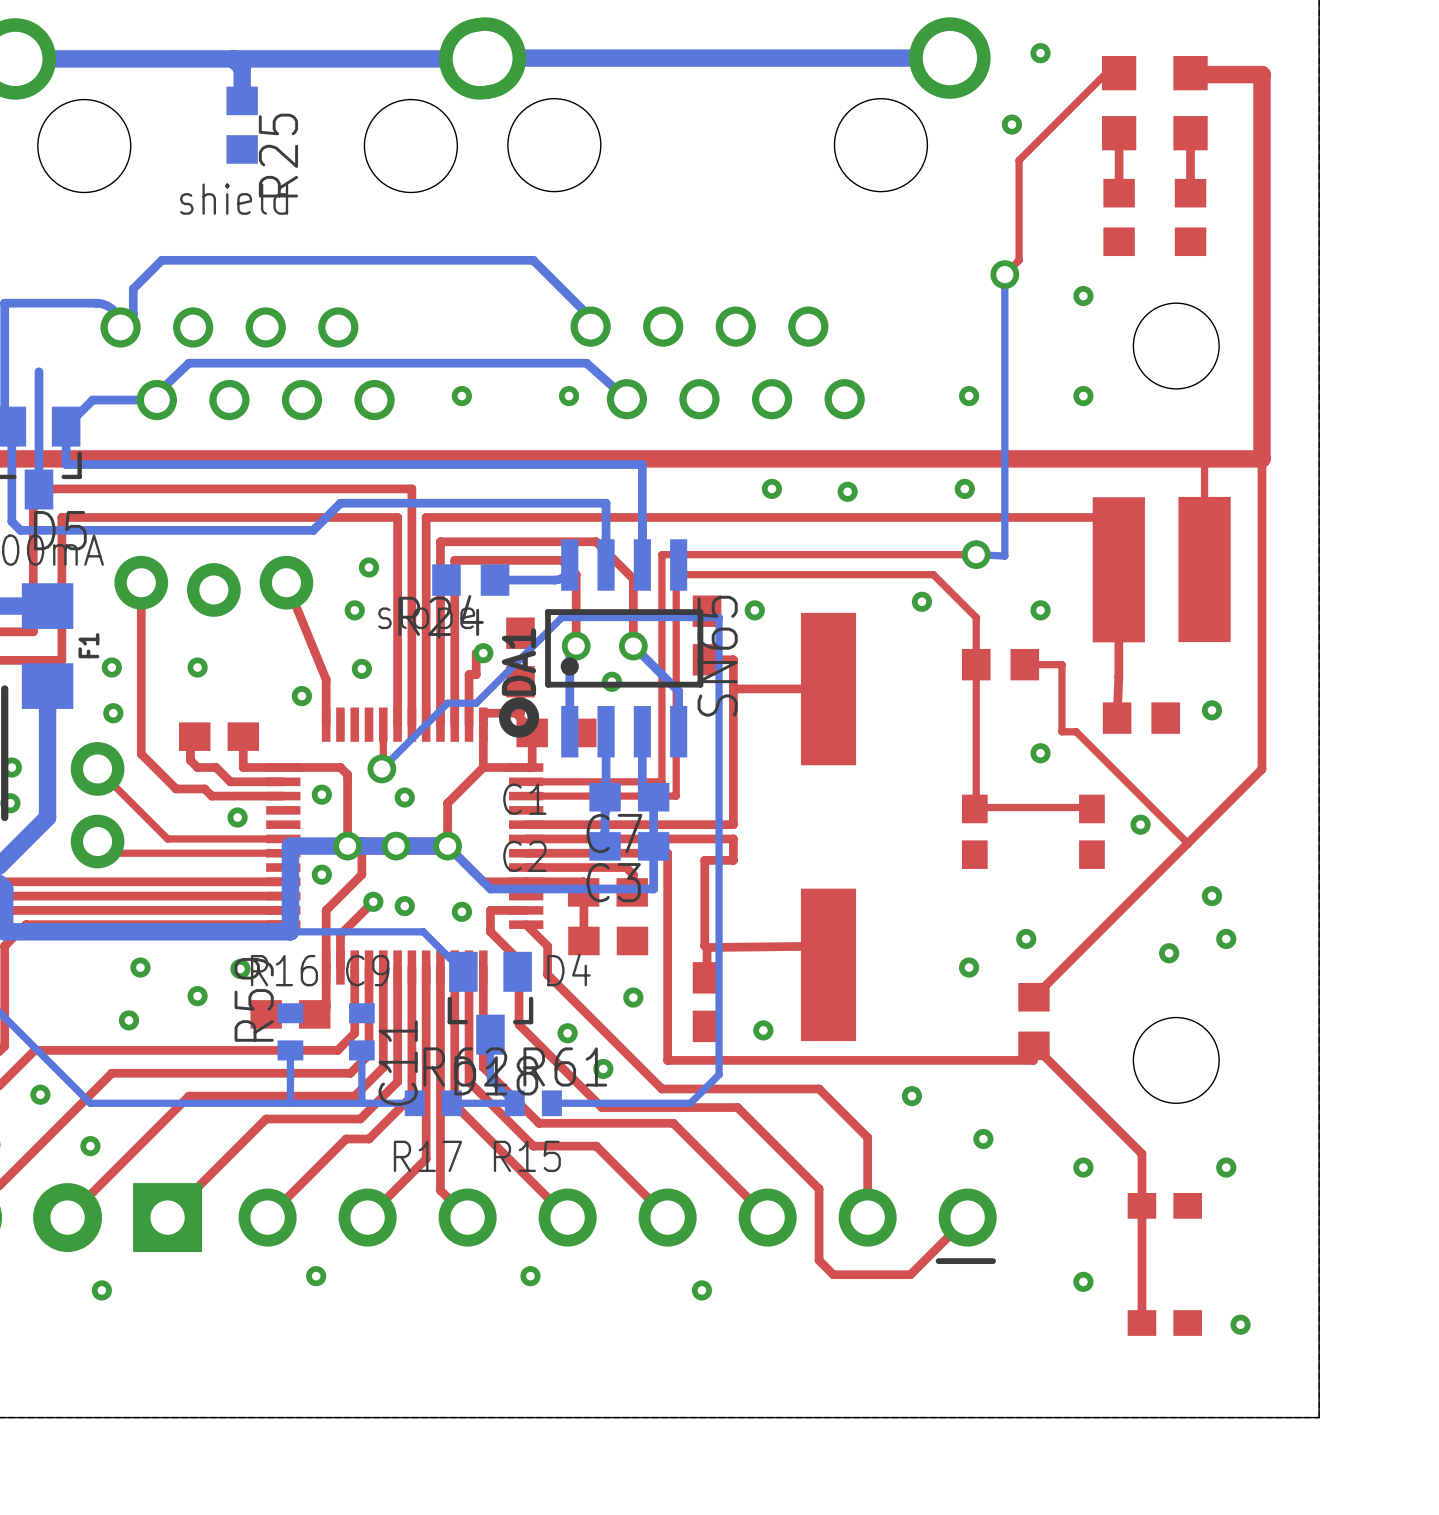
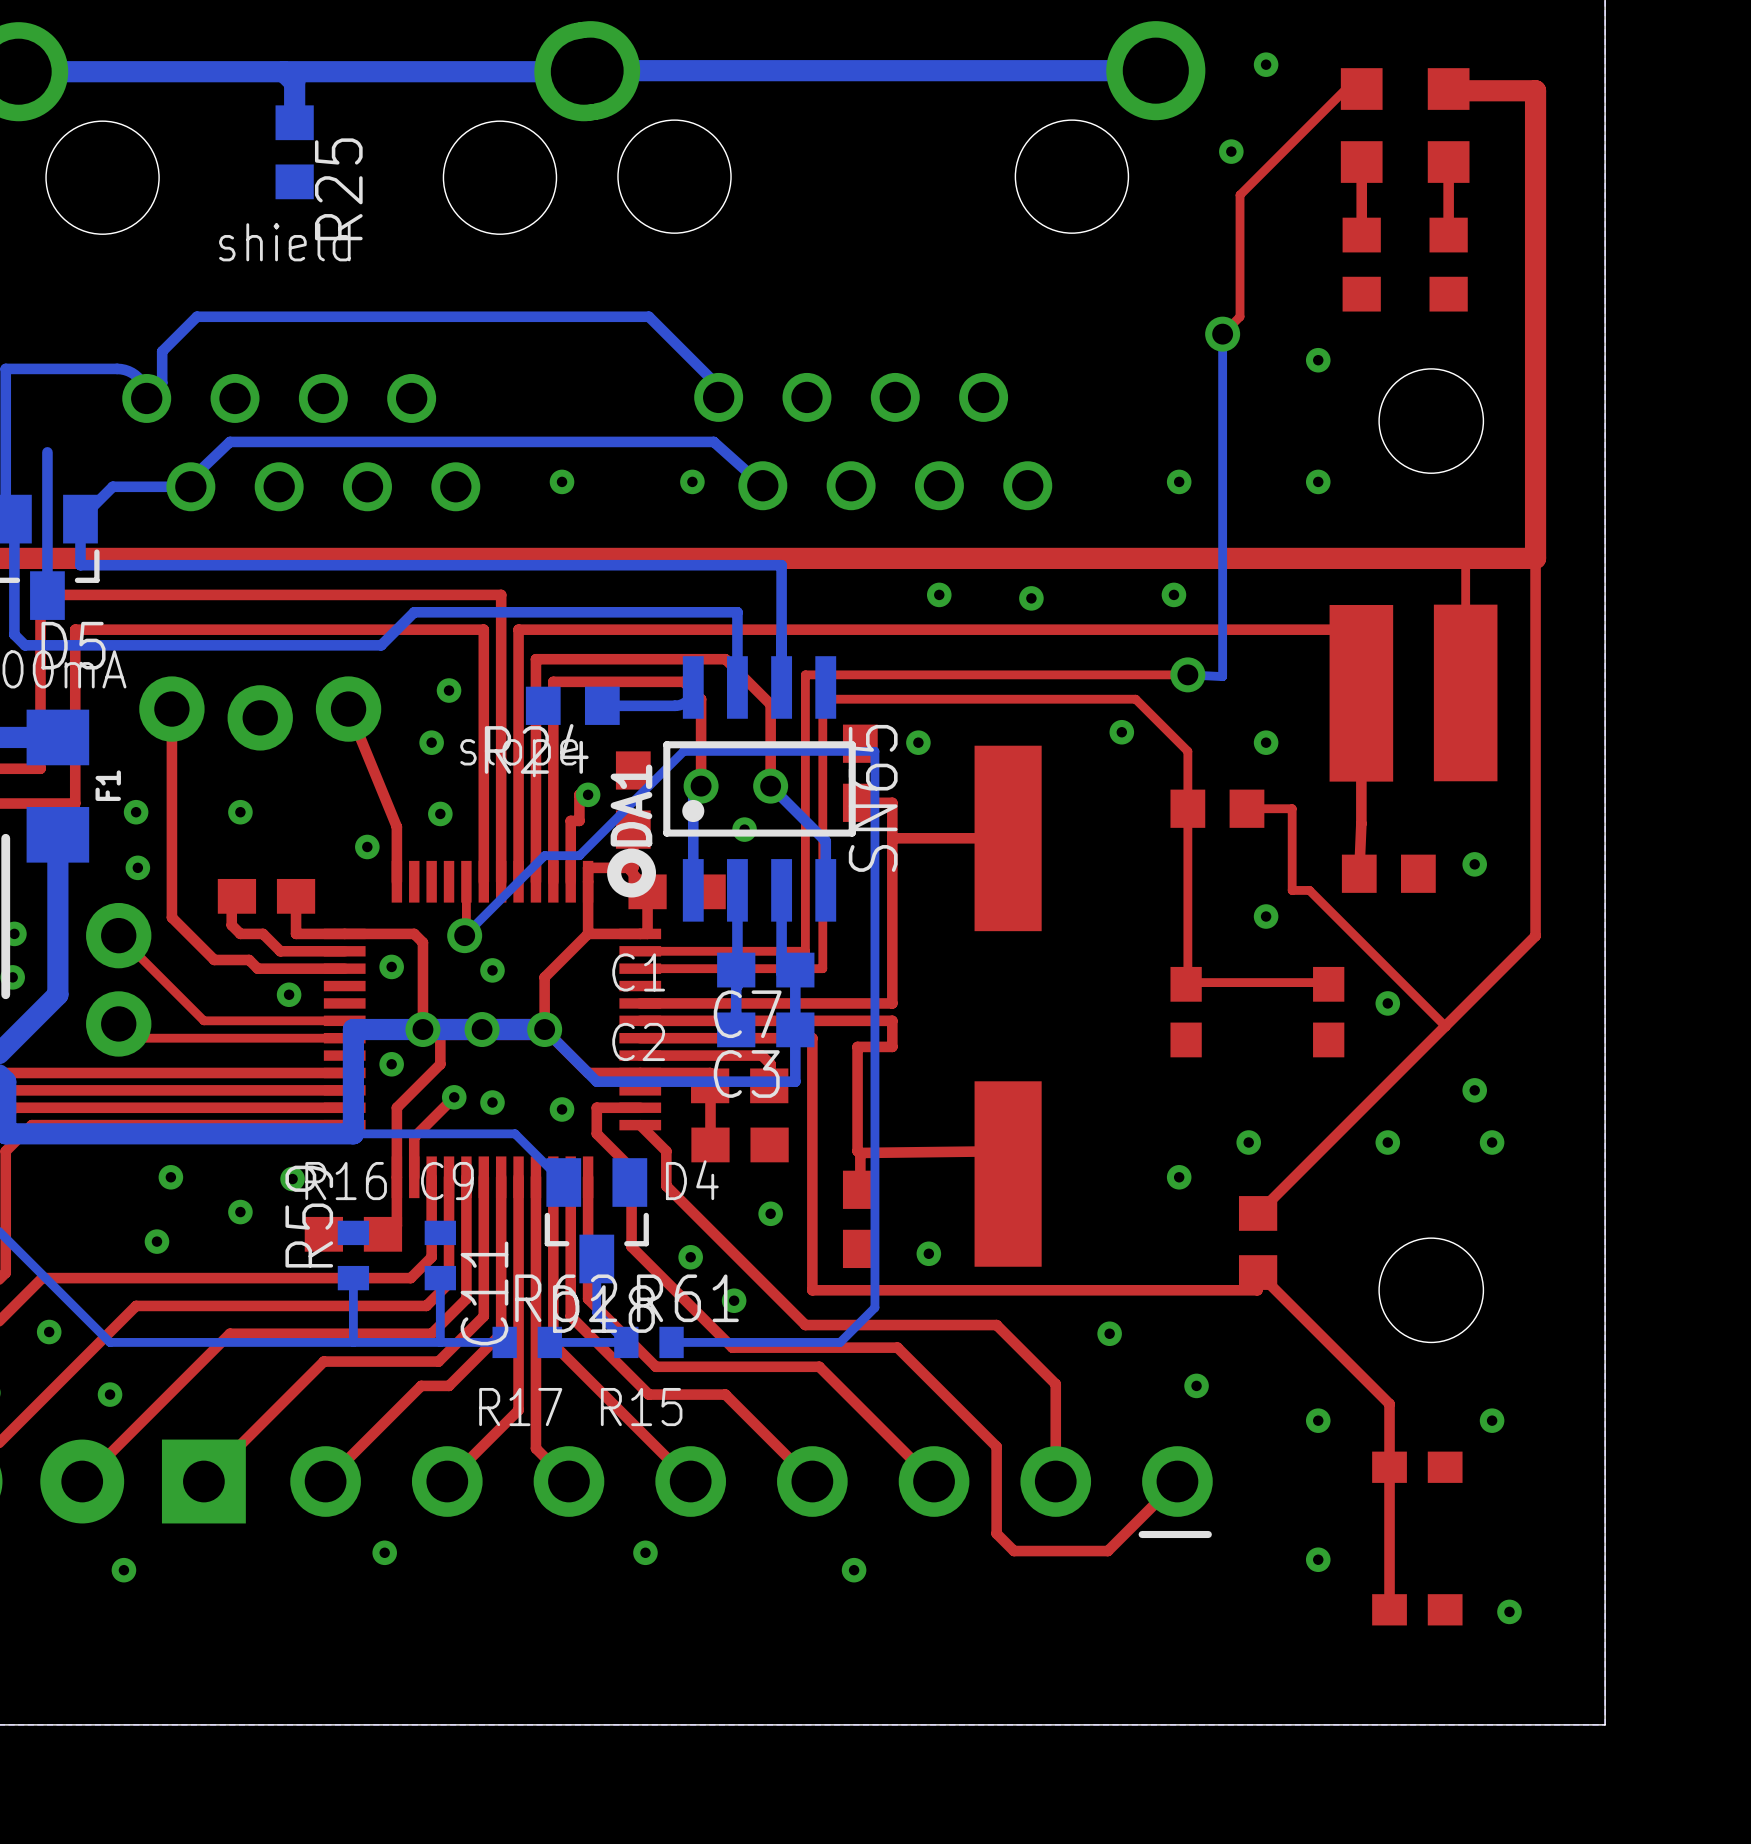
via position: (1169, 953) -> (1387, 1142)

